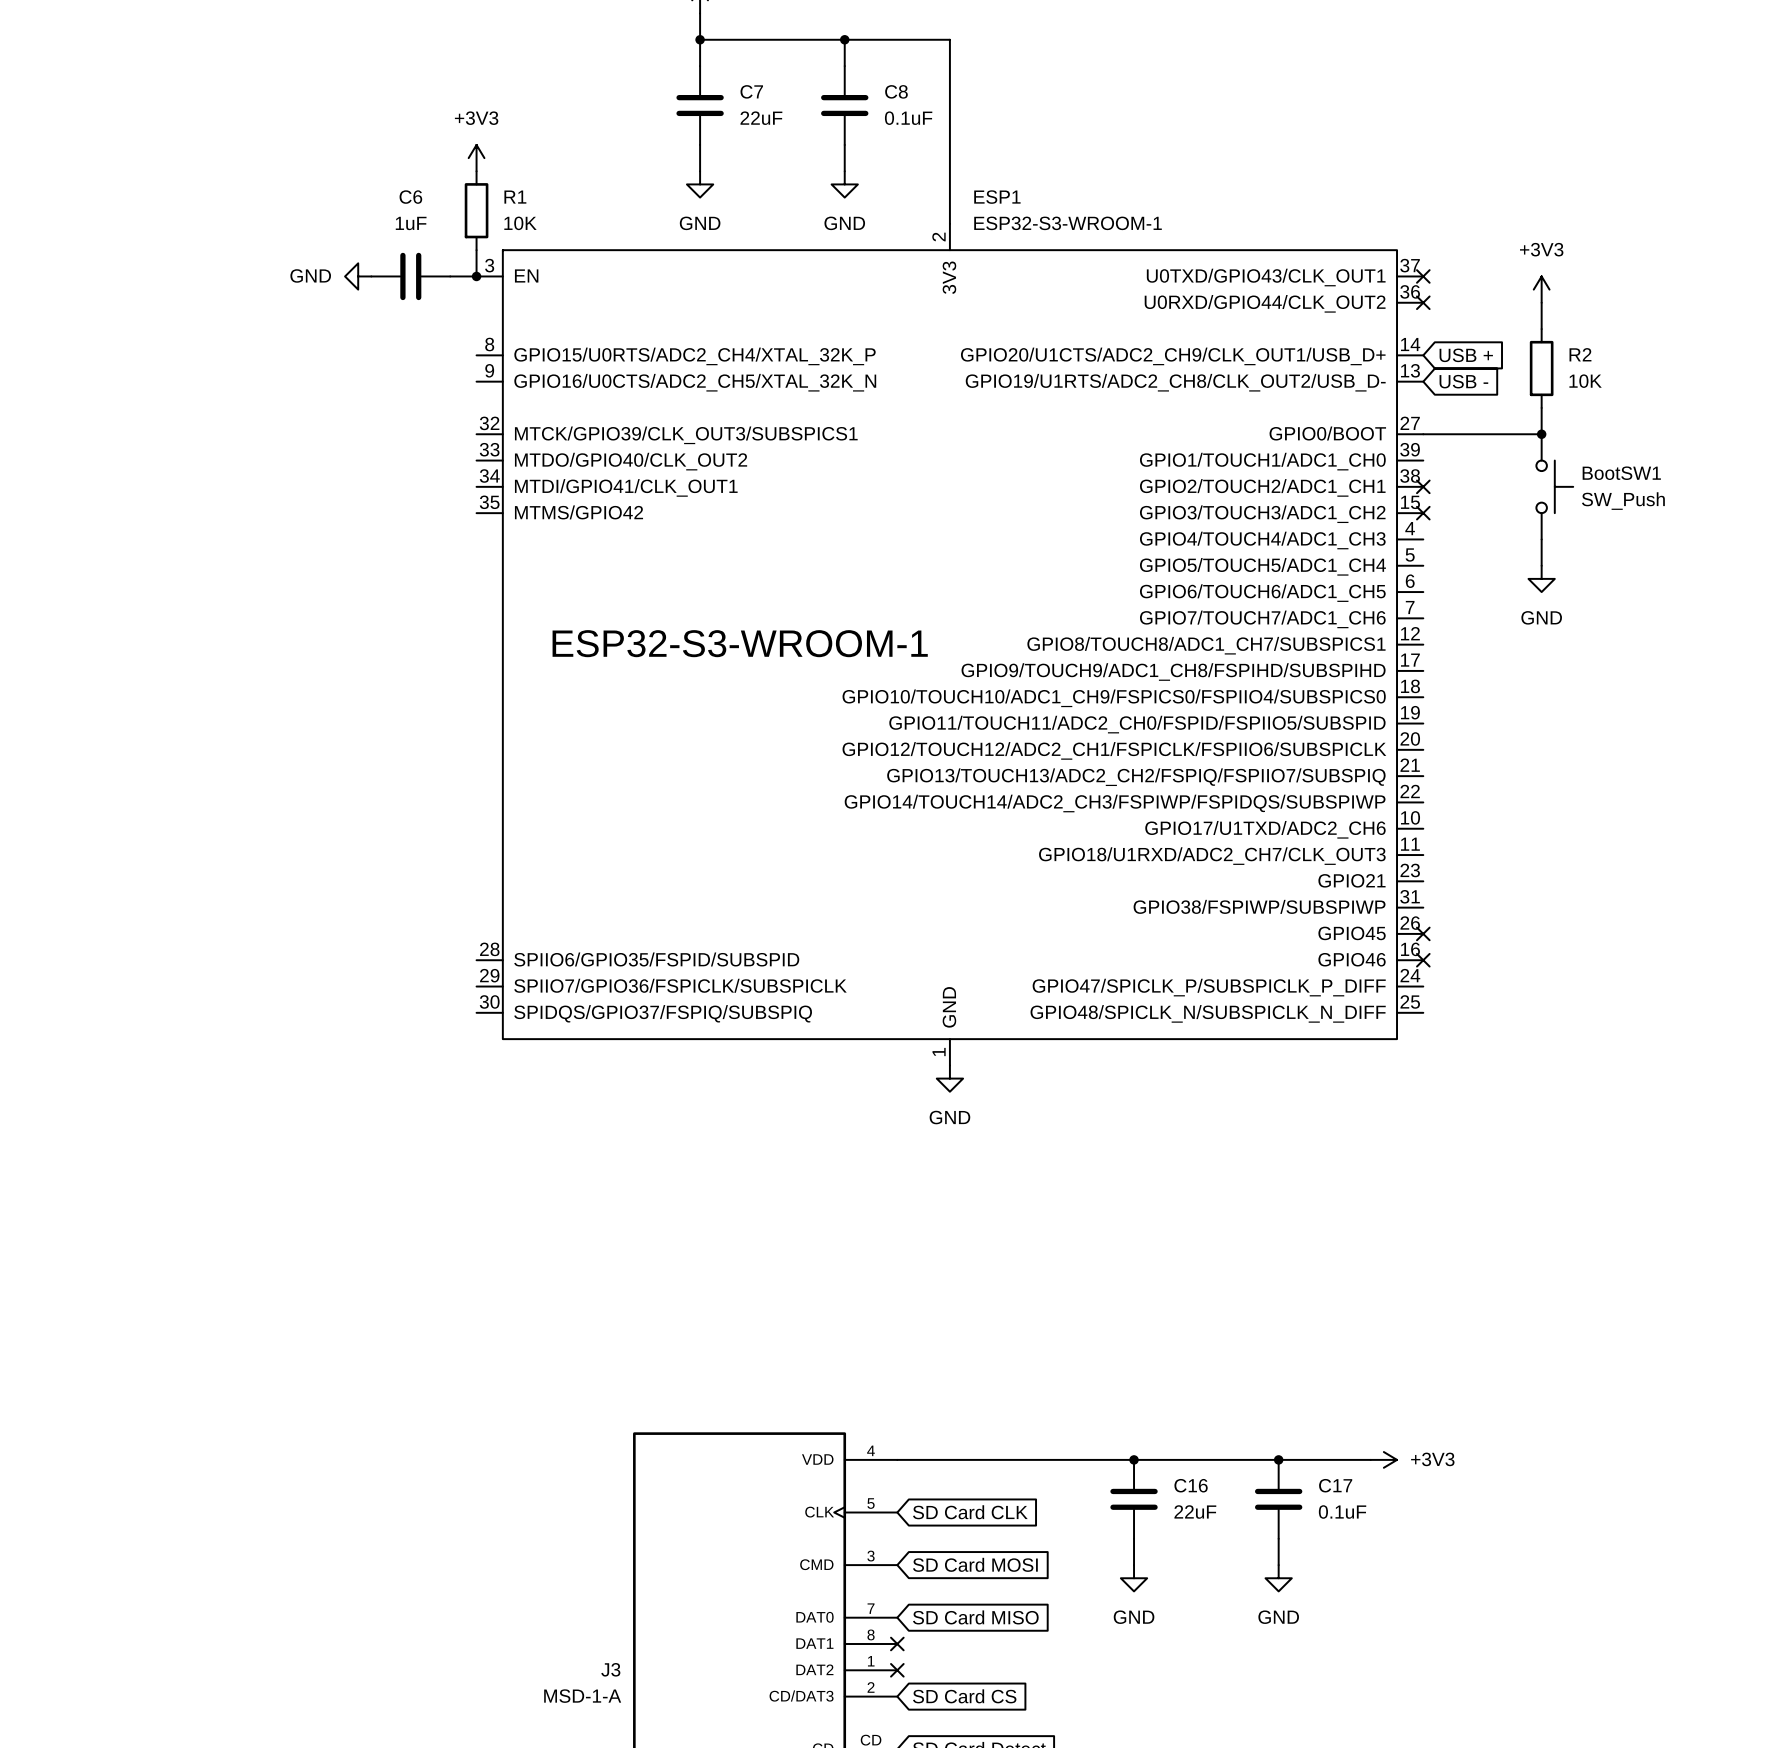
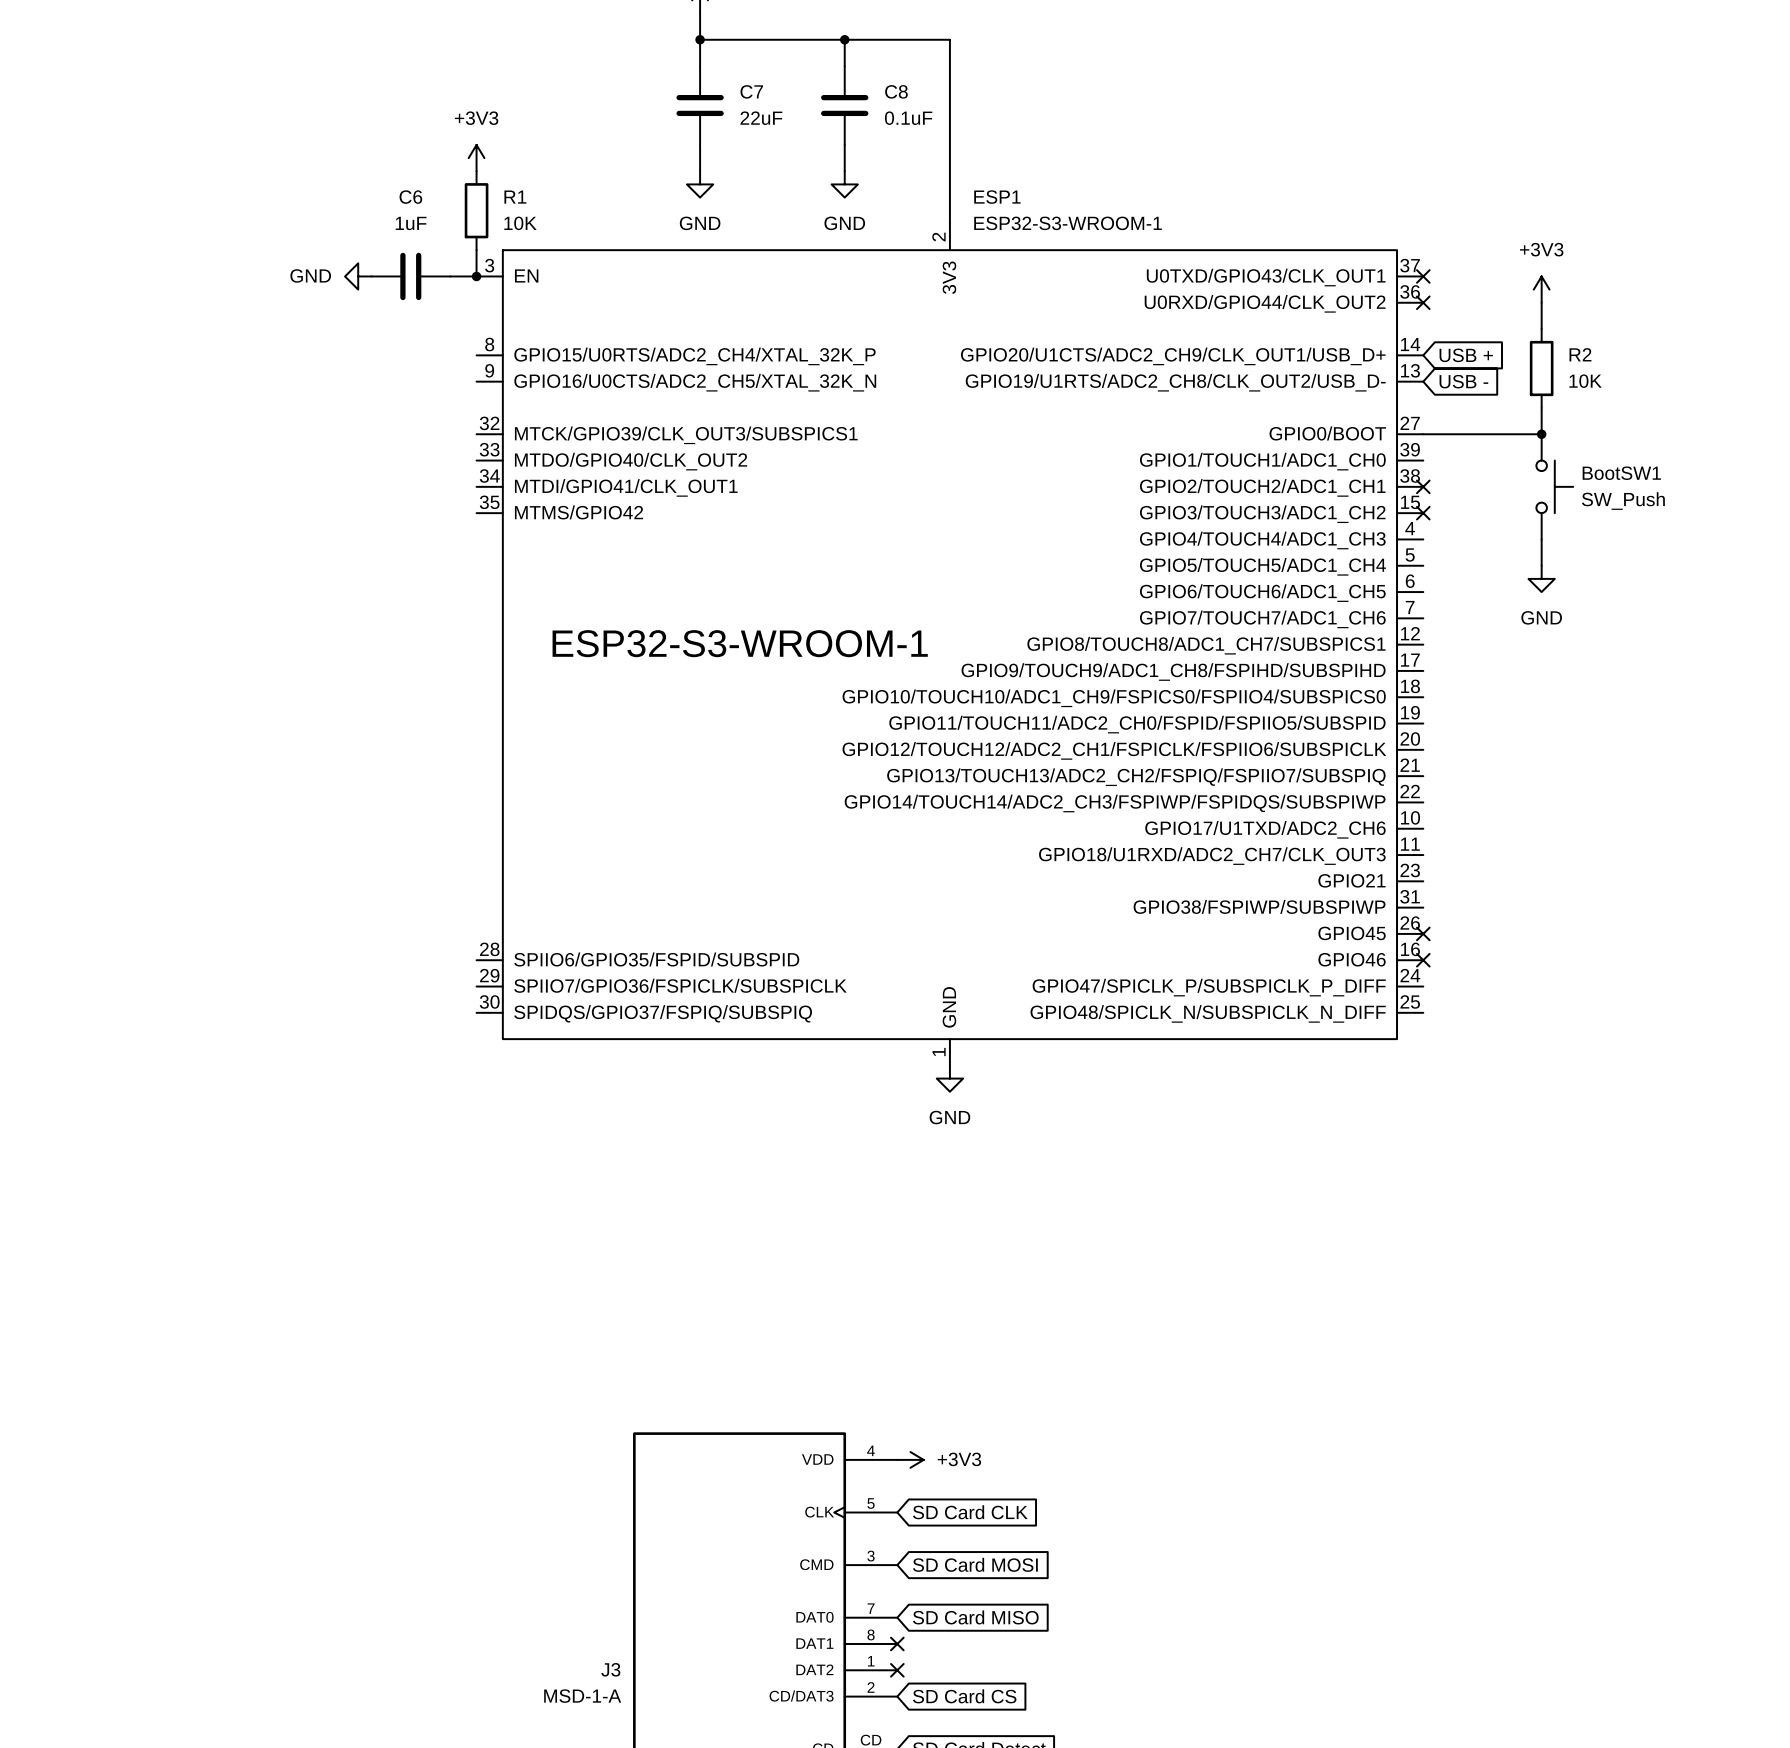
wire: (897, 1459) (1370, 1459) -> none
power symbol: none -> +3V3 (910, 1459)
junction: (1134, 1459) -> none
junction: (1278, 1459) -> none
power symbol: +3V3 (1383, 1459) -> none
C16: 22uF (1134, 1499) -> none
C17: 0.1uF (1278, 1499) -> none
wire: (1134, 1538) (1134, 1565) -> none
wire: (1278, 1538) (1278, 1565) -> none
power symbol: GND (1134, 1578) -> none
power symbol: GND (1278, 1578) -> none

